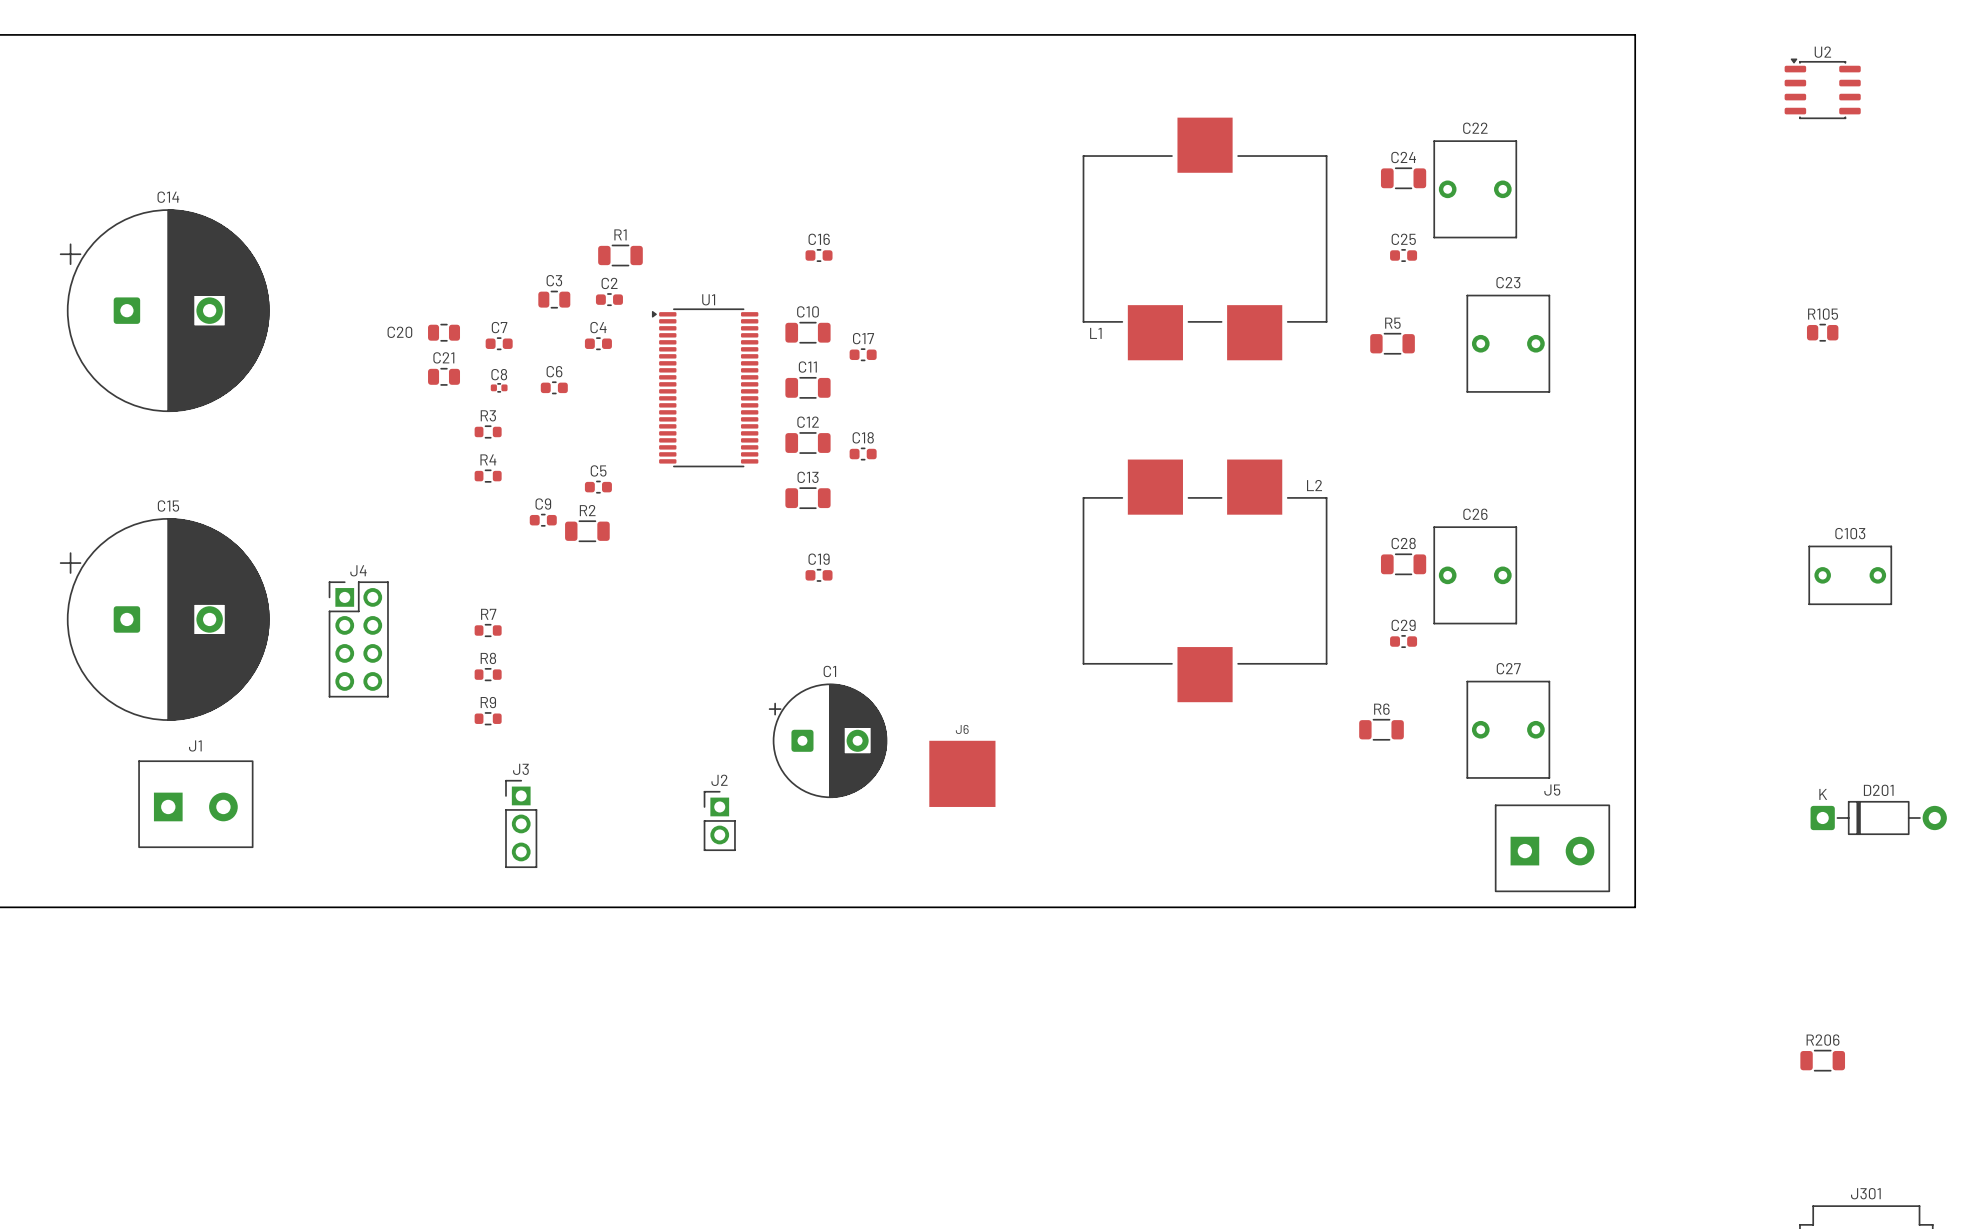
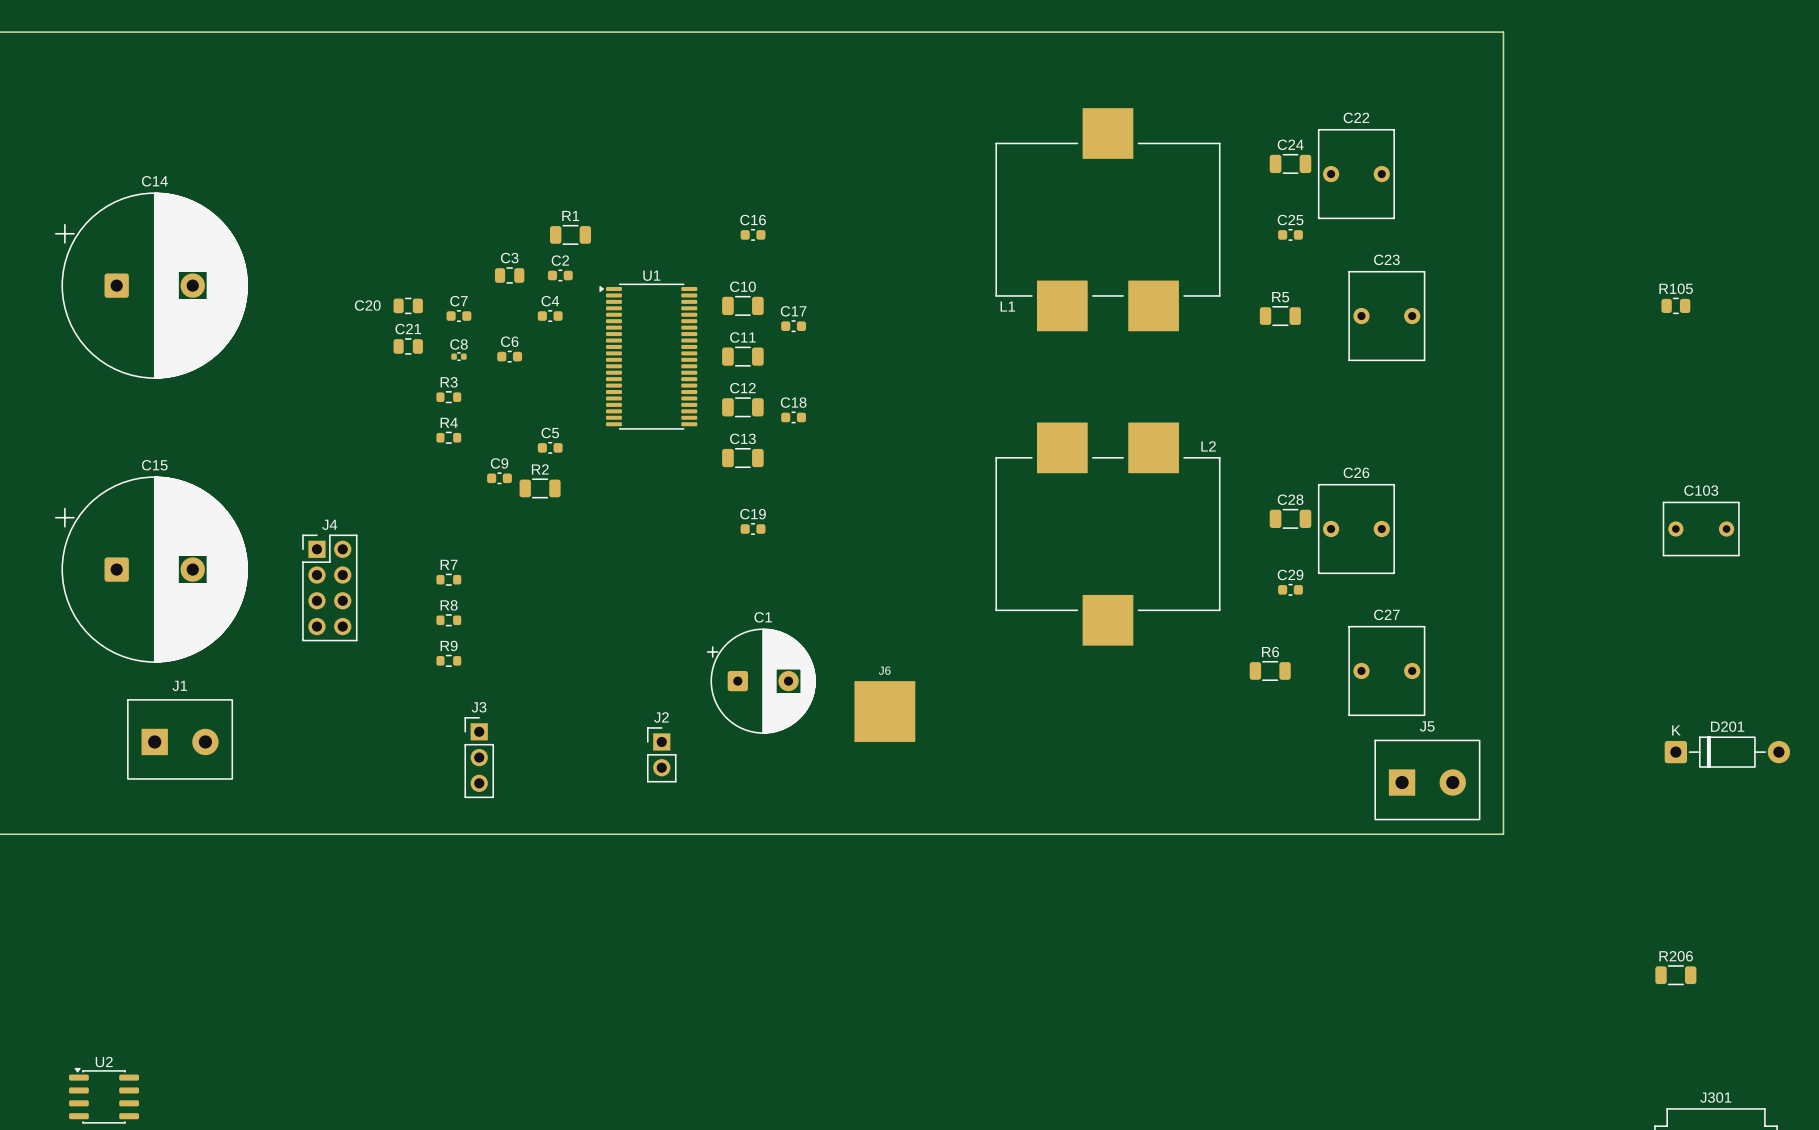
U2 position: (1822, 88) -> (104, 1095)

